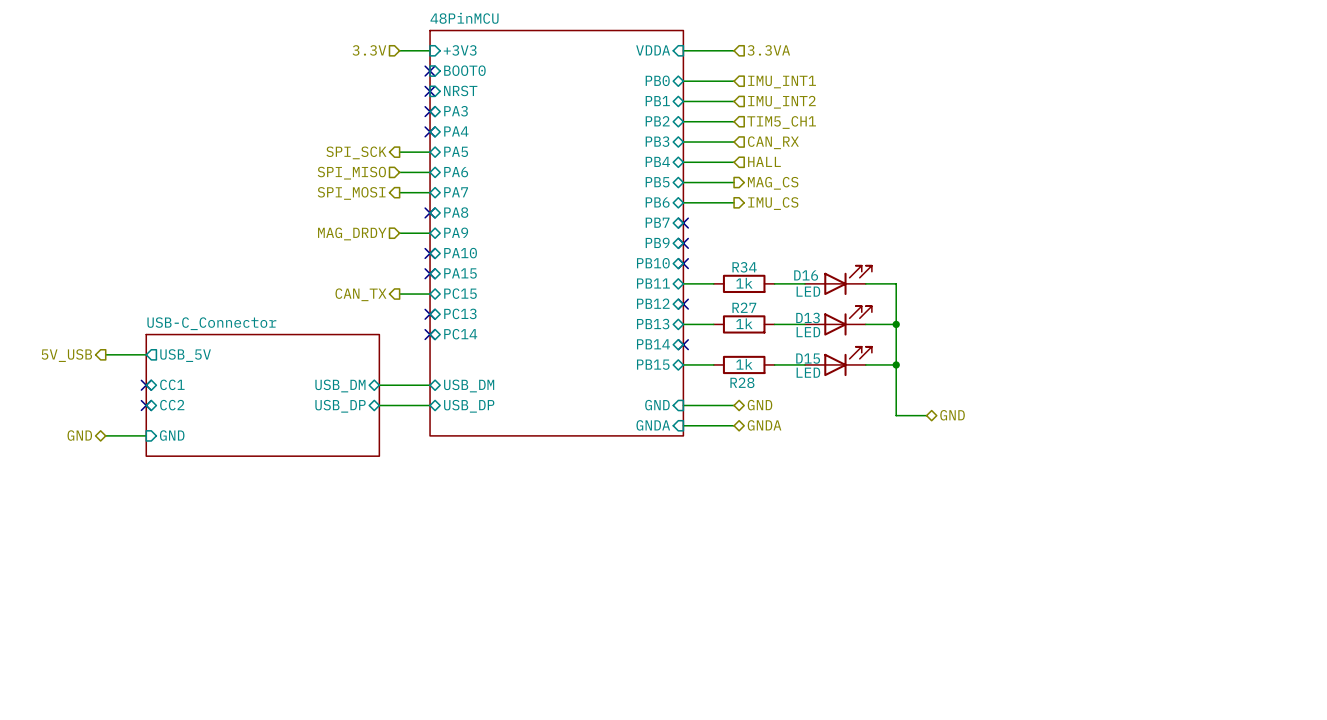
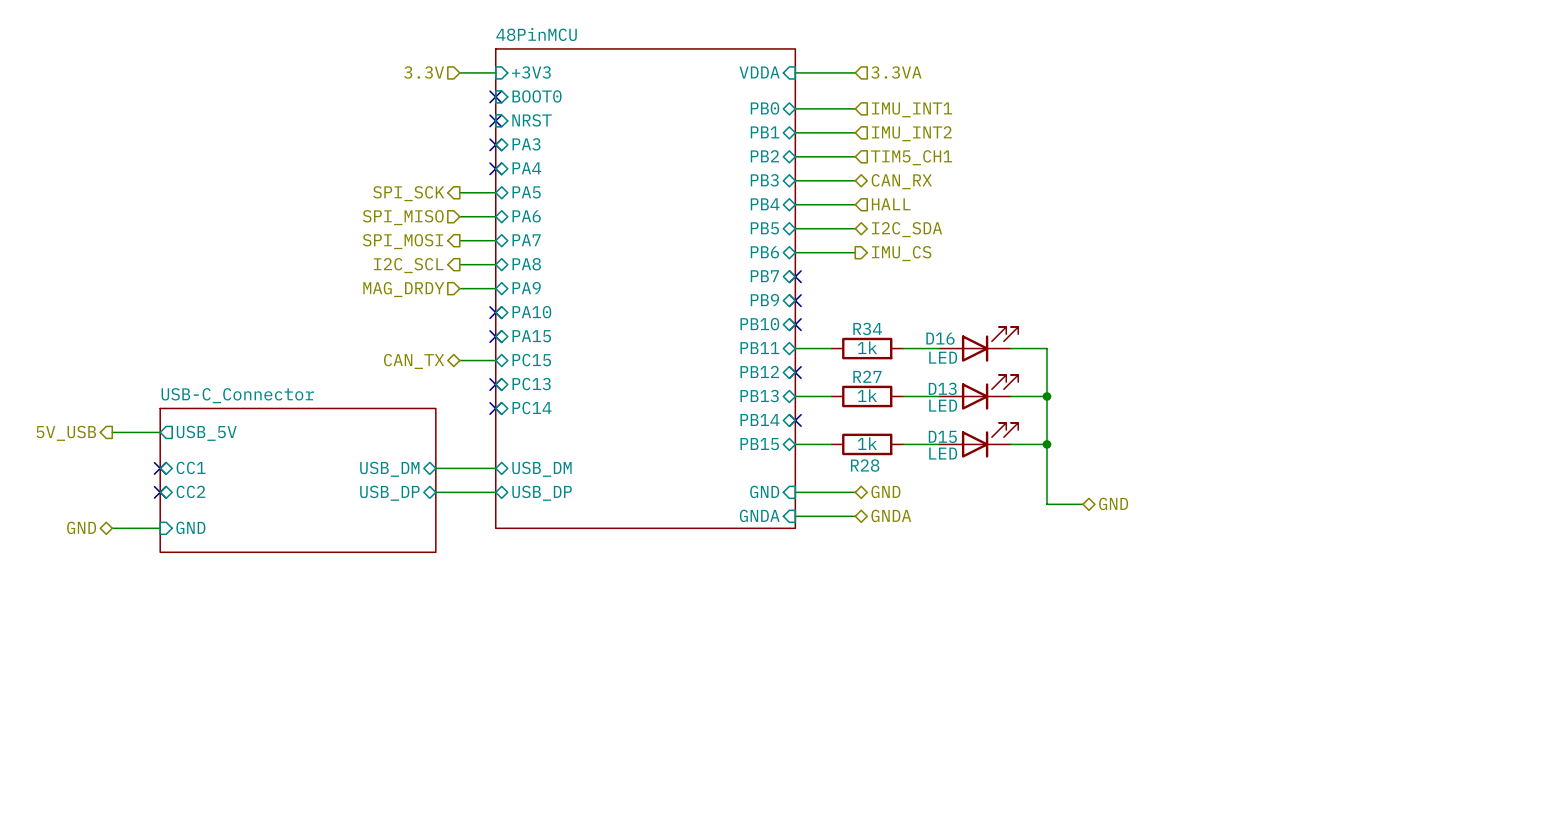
hierarchical label shape: input (773, 142) -> bidirectional (901, 181)
hierarchical label shape: output (773, 183) -> bidirectional (907, 229)
hierarchical label: MAG_CS (773, 183) -> I2C_SDA (907, 229)
wire: none -> (459, 264) (495, 264)
no-connect mark: (430, 212) -> none
hierarchical label: none -> I2C_SCL (408, 265)
hierarchical label shape: output (360, 294) -> bidirectional (414, 361)

